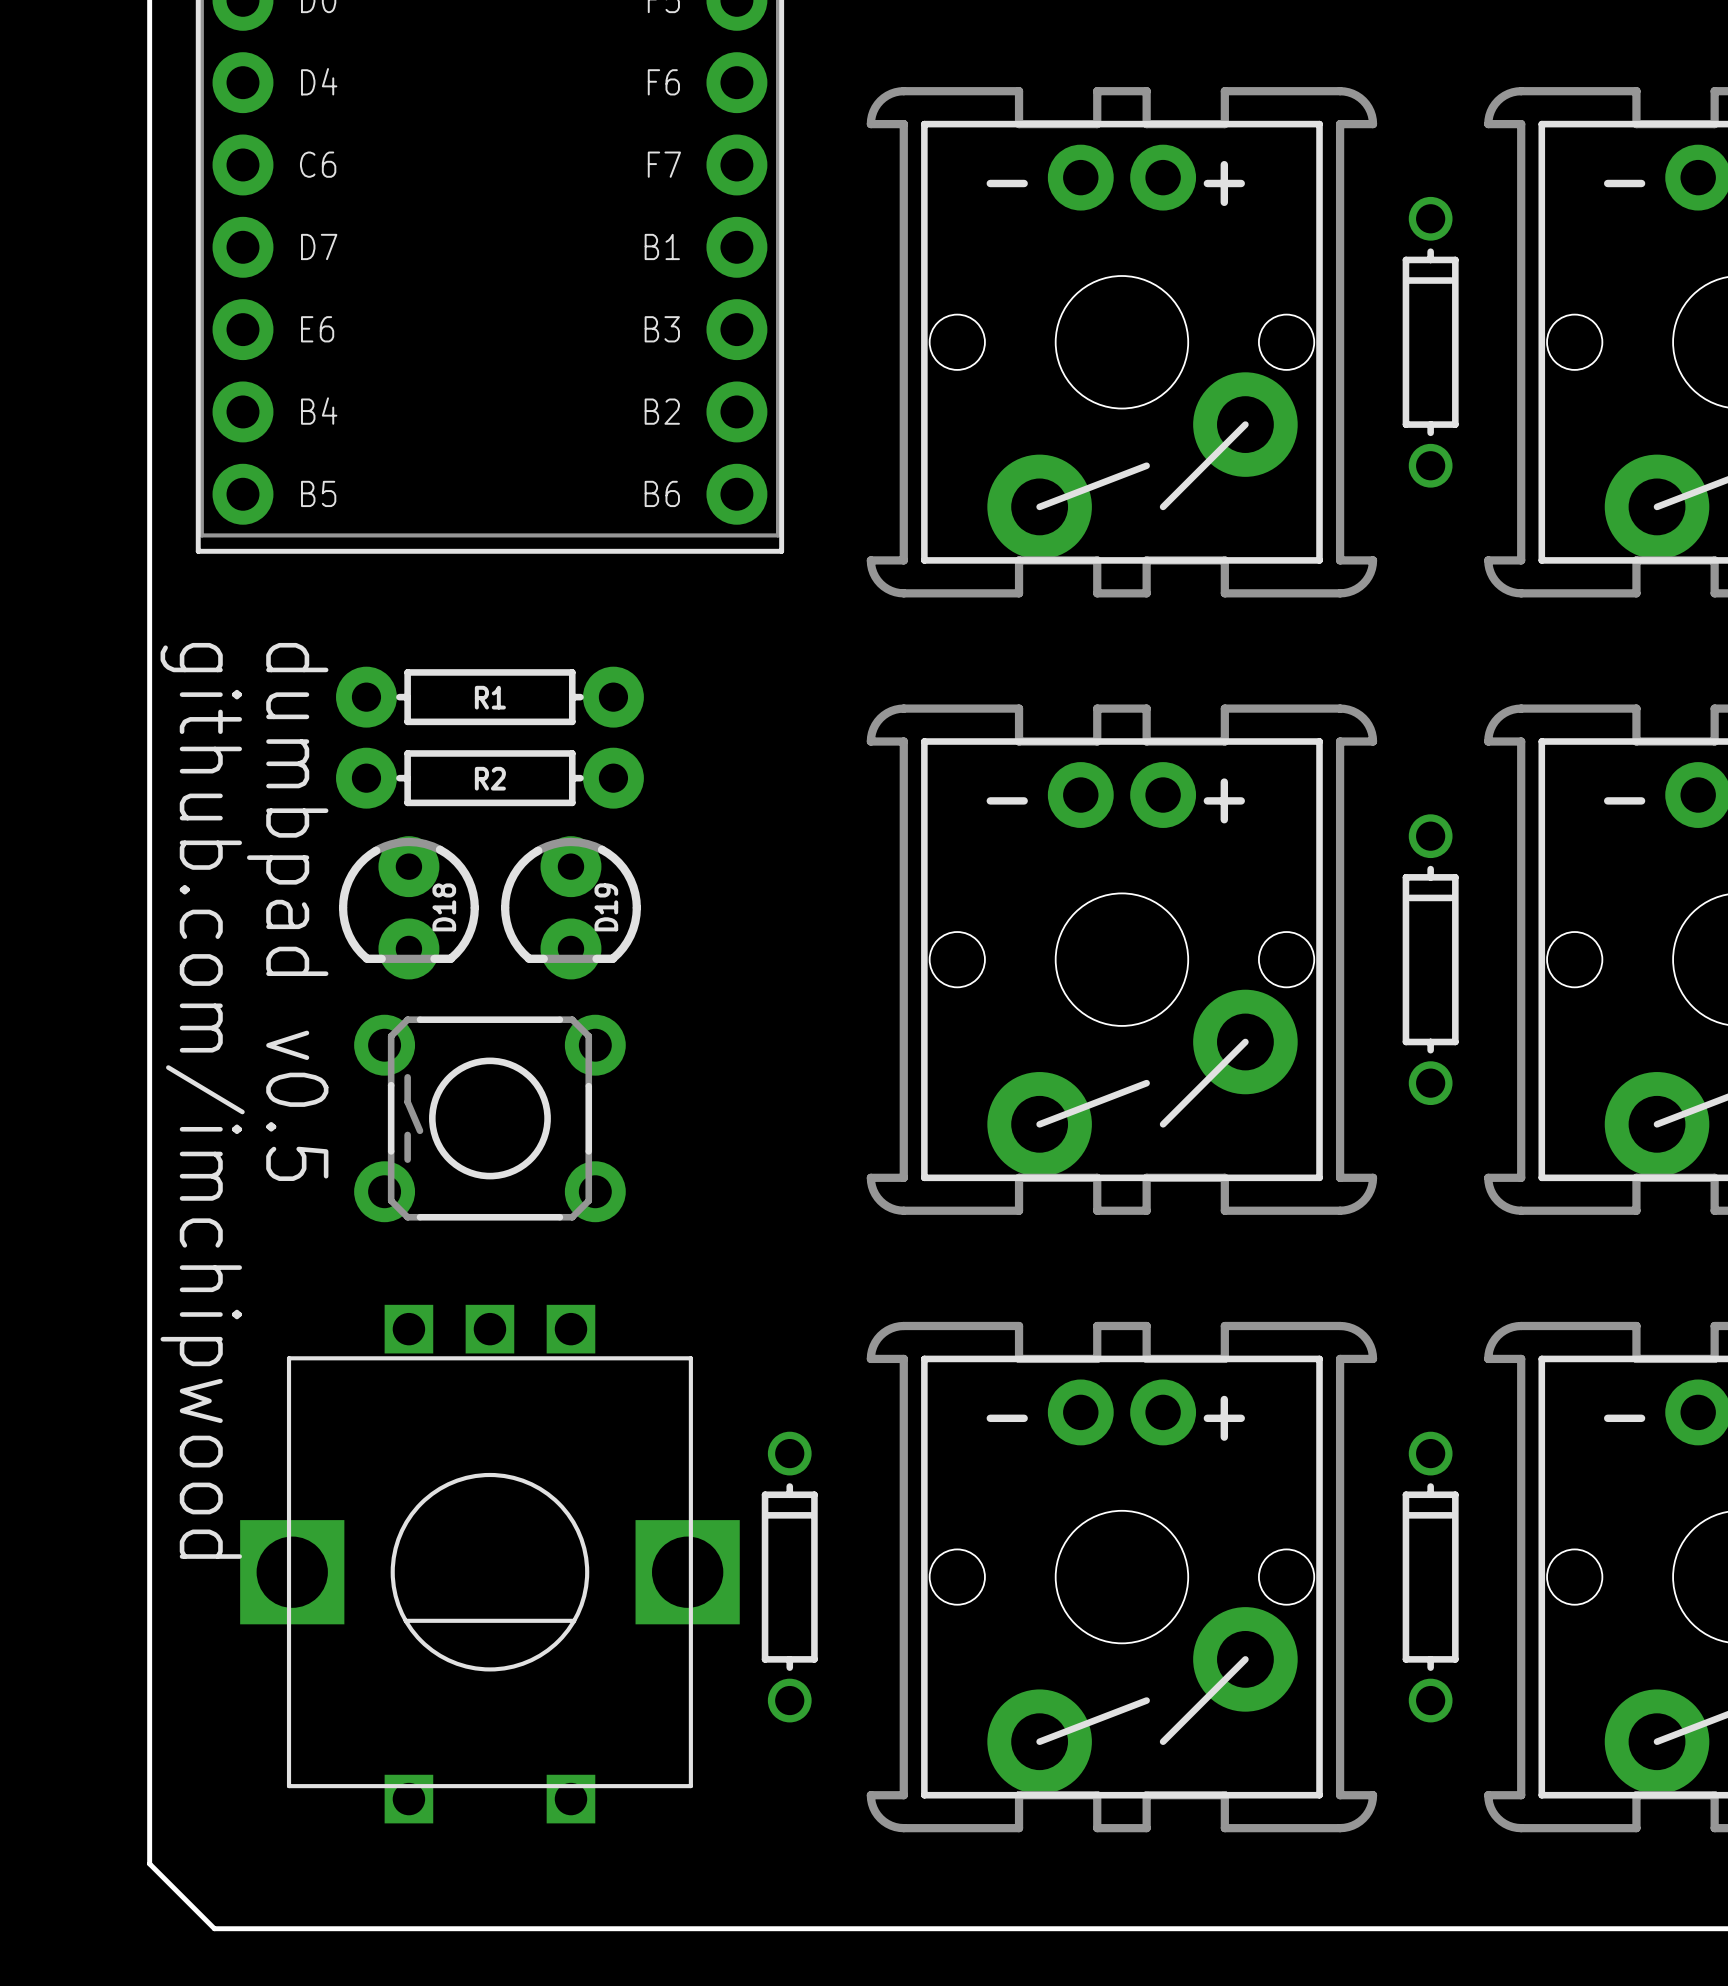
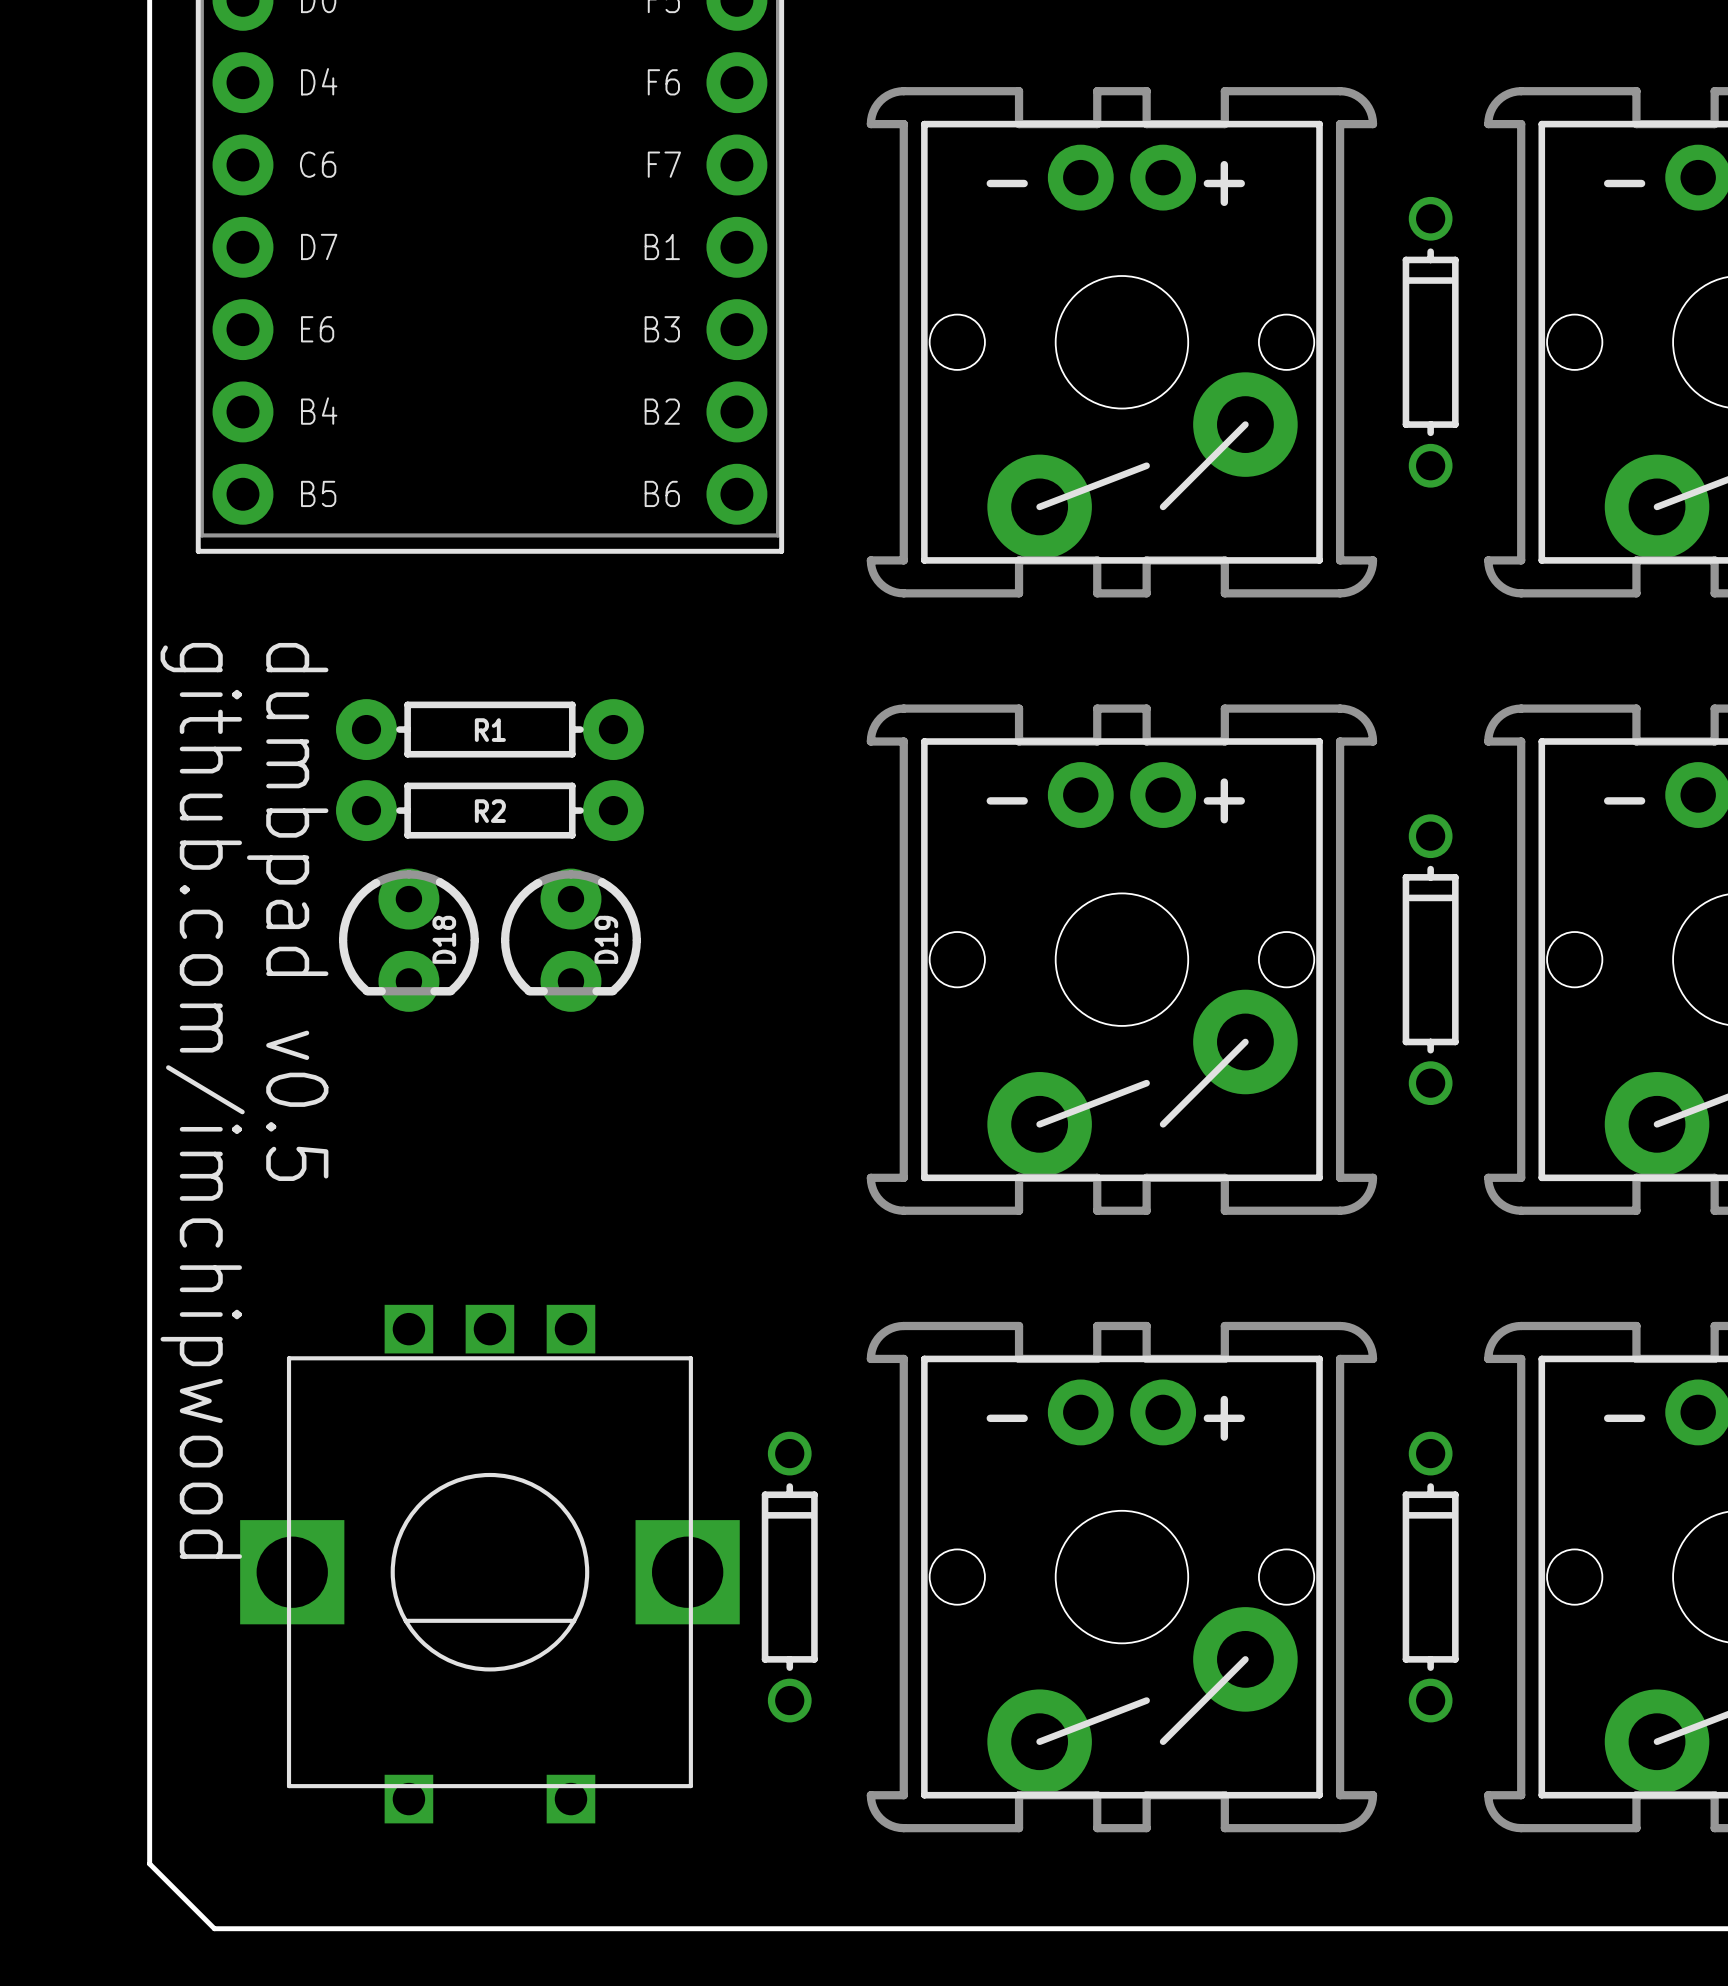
R1 position: (489, 697) -> (489, 729)
R2 position: (489, 778) -> (489, 810)
D18 position: (408, 907) -> (408, 940)
D19 position: (570, 907) -> (570, 940)
part: (489, 1118) -> none

